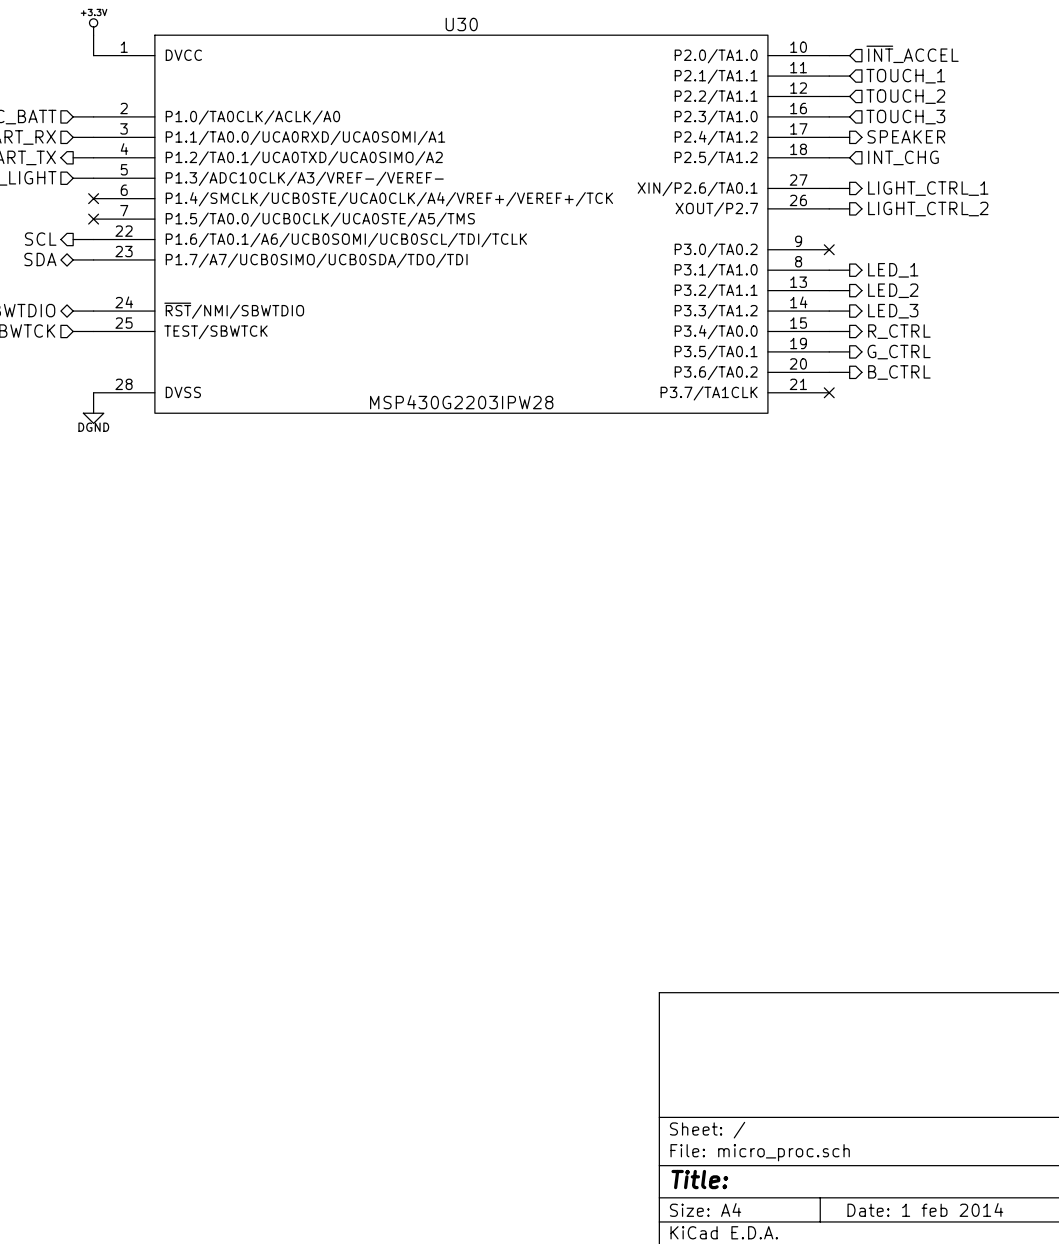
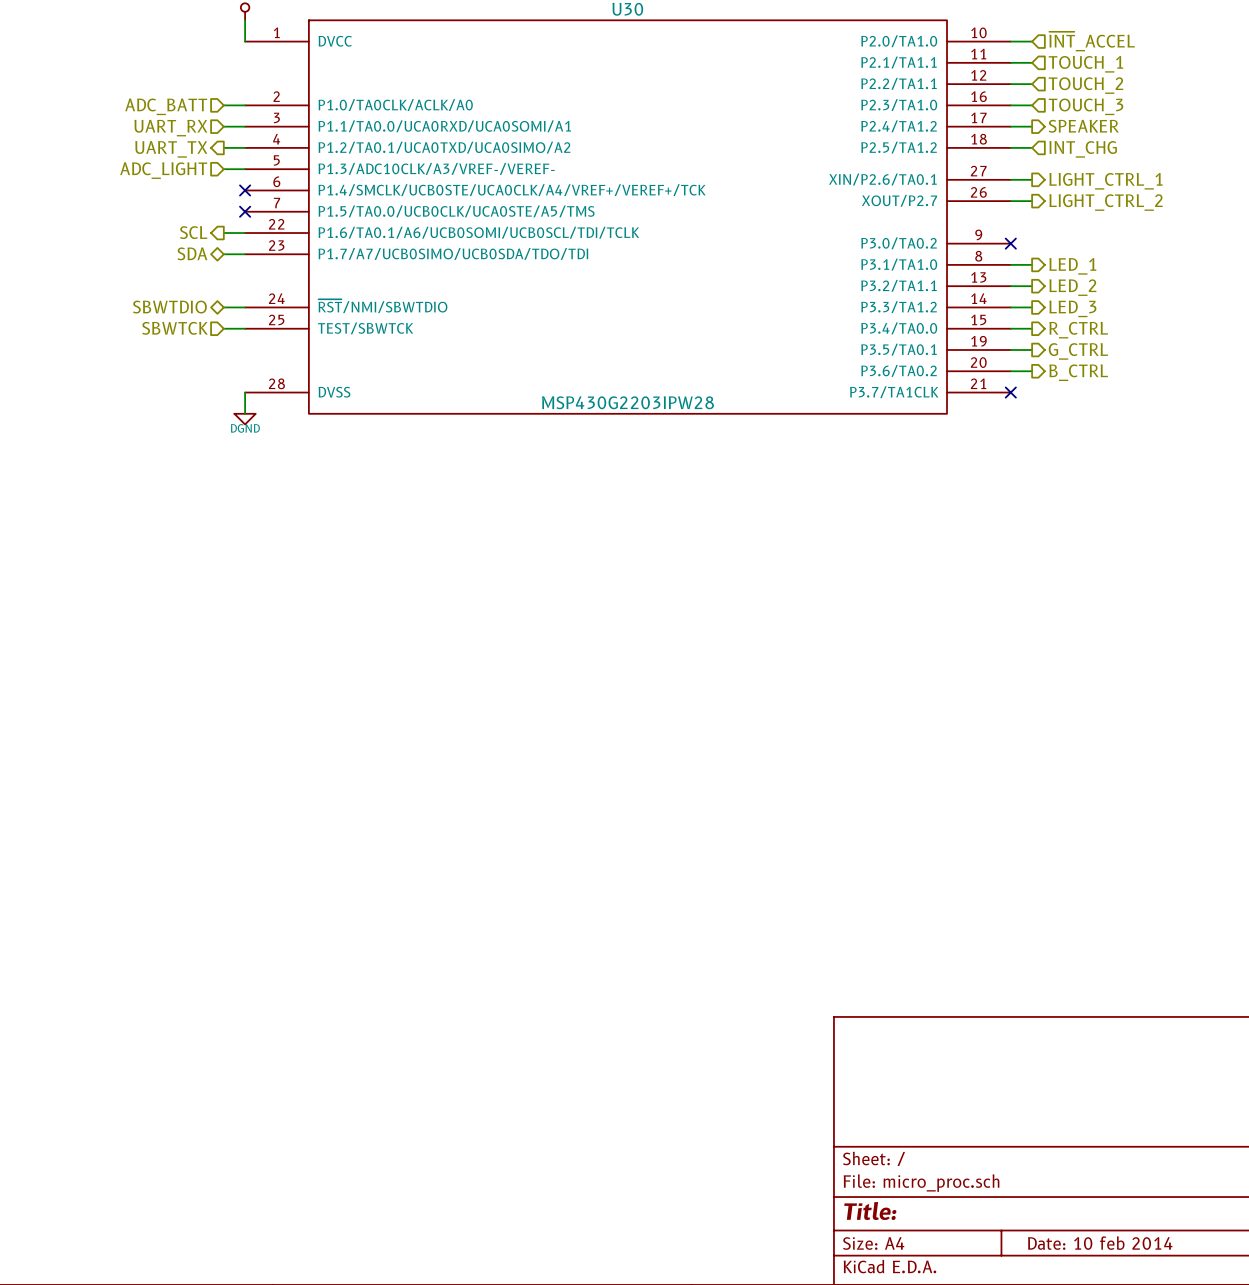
title block: Date: 1 feb 2014 (925, 1209) -> Date: 10 feb 2014 (1100, 1243)

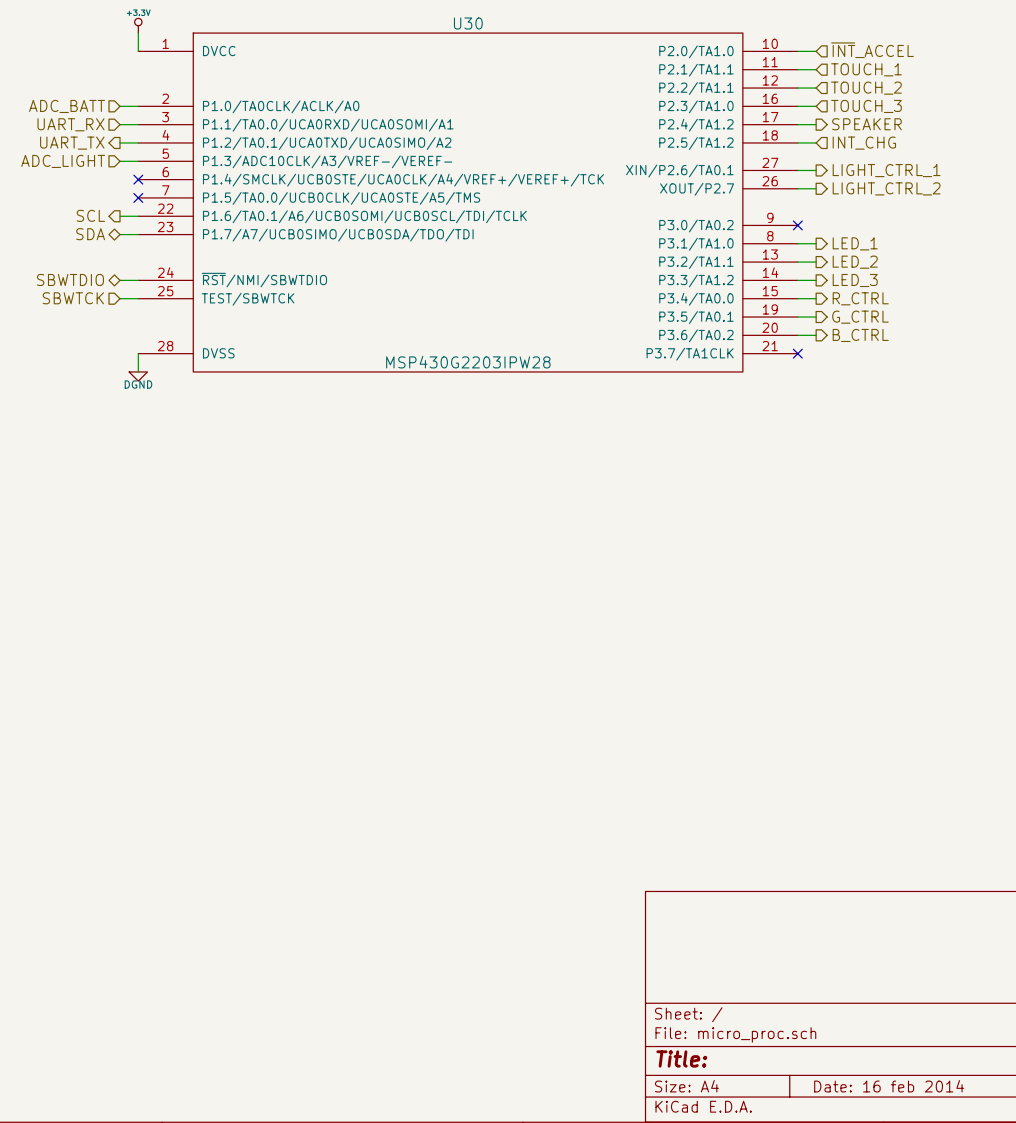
title block: Date: 10 feb 2014 (1100, 1243) -> Date: 16 feb 2014 (889, 1086)

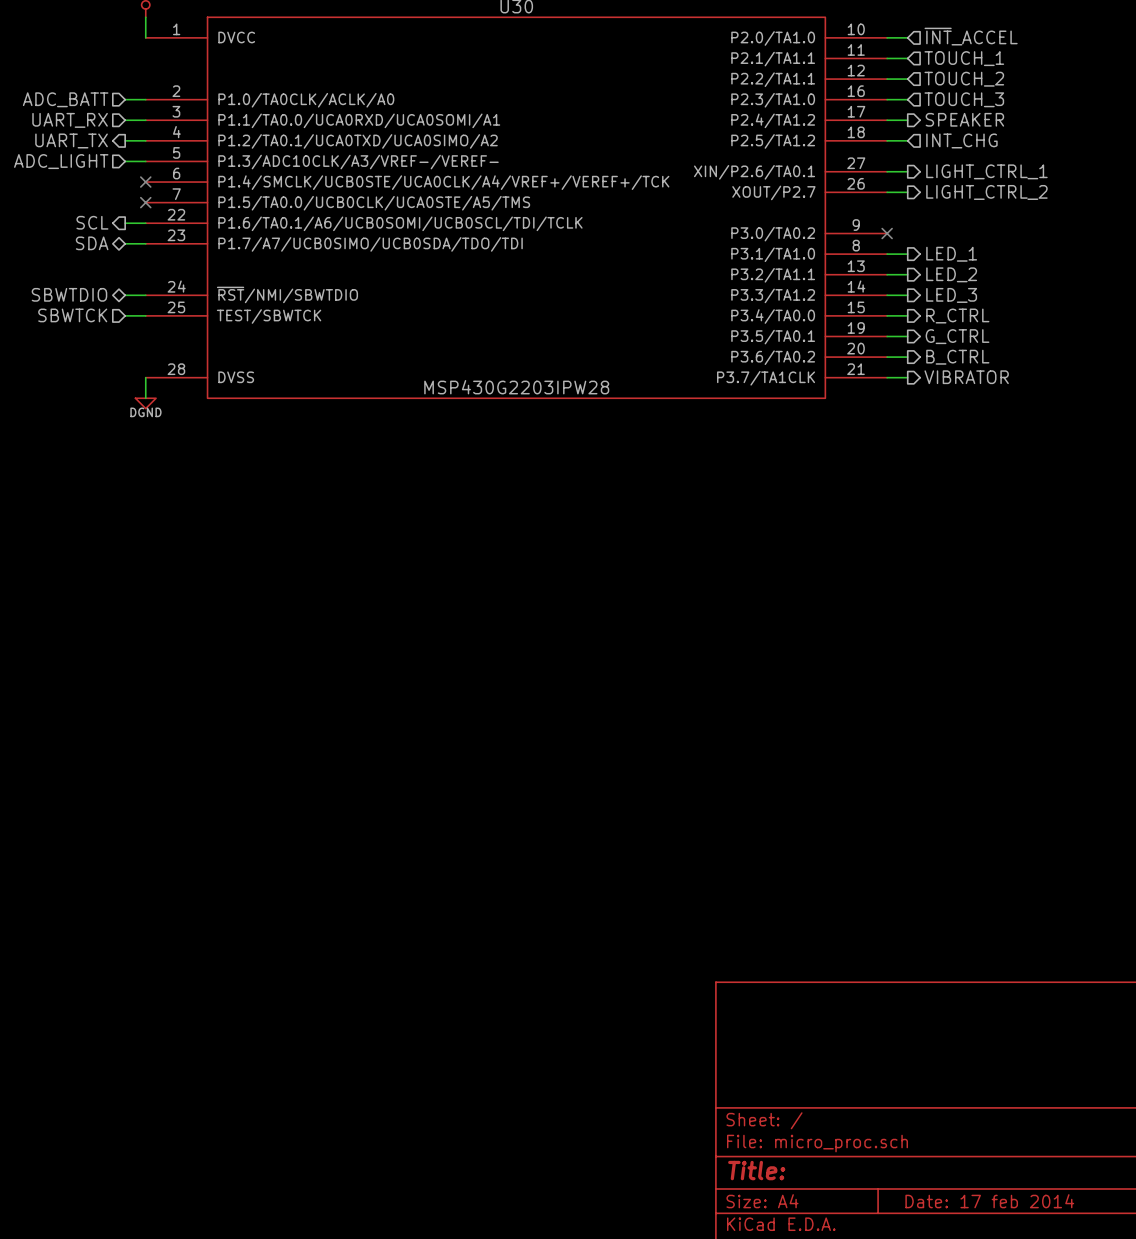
wire: none -> (887, 377) (907, 377)
no-connect mark: (797, 353) -> none
hierarchical label: none -> VIBRATOR (966, 377)
title block: Date: 16 feb 2014 (889, 1086) -> Date: 17 feb 2014 (989, 1201)

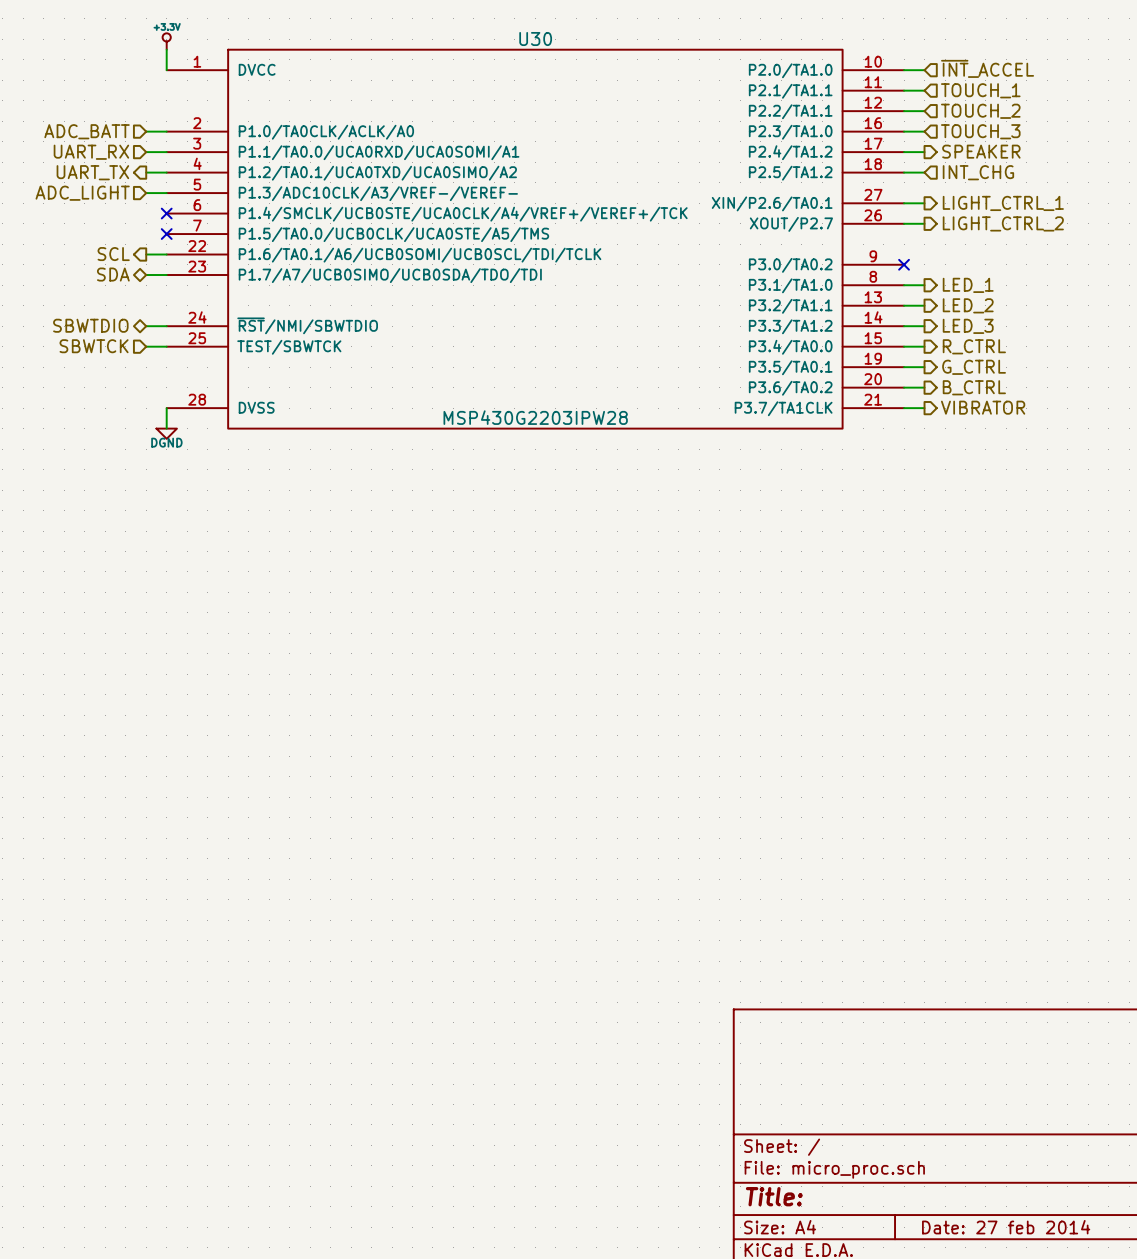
title block: Date: 17 feb 2014 (989, 1201) -> Date: 27 feb 2014 (1006, 1227)

